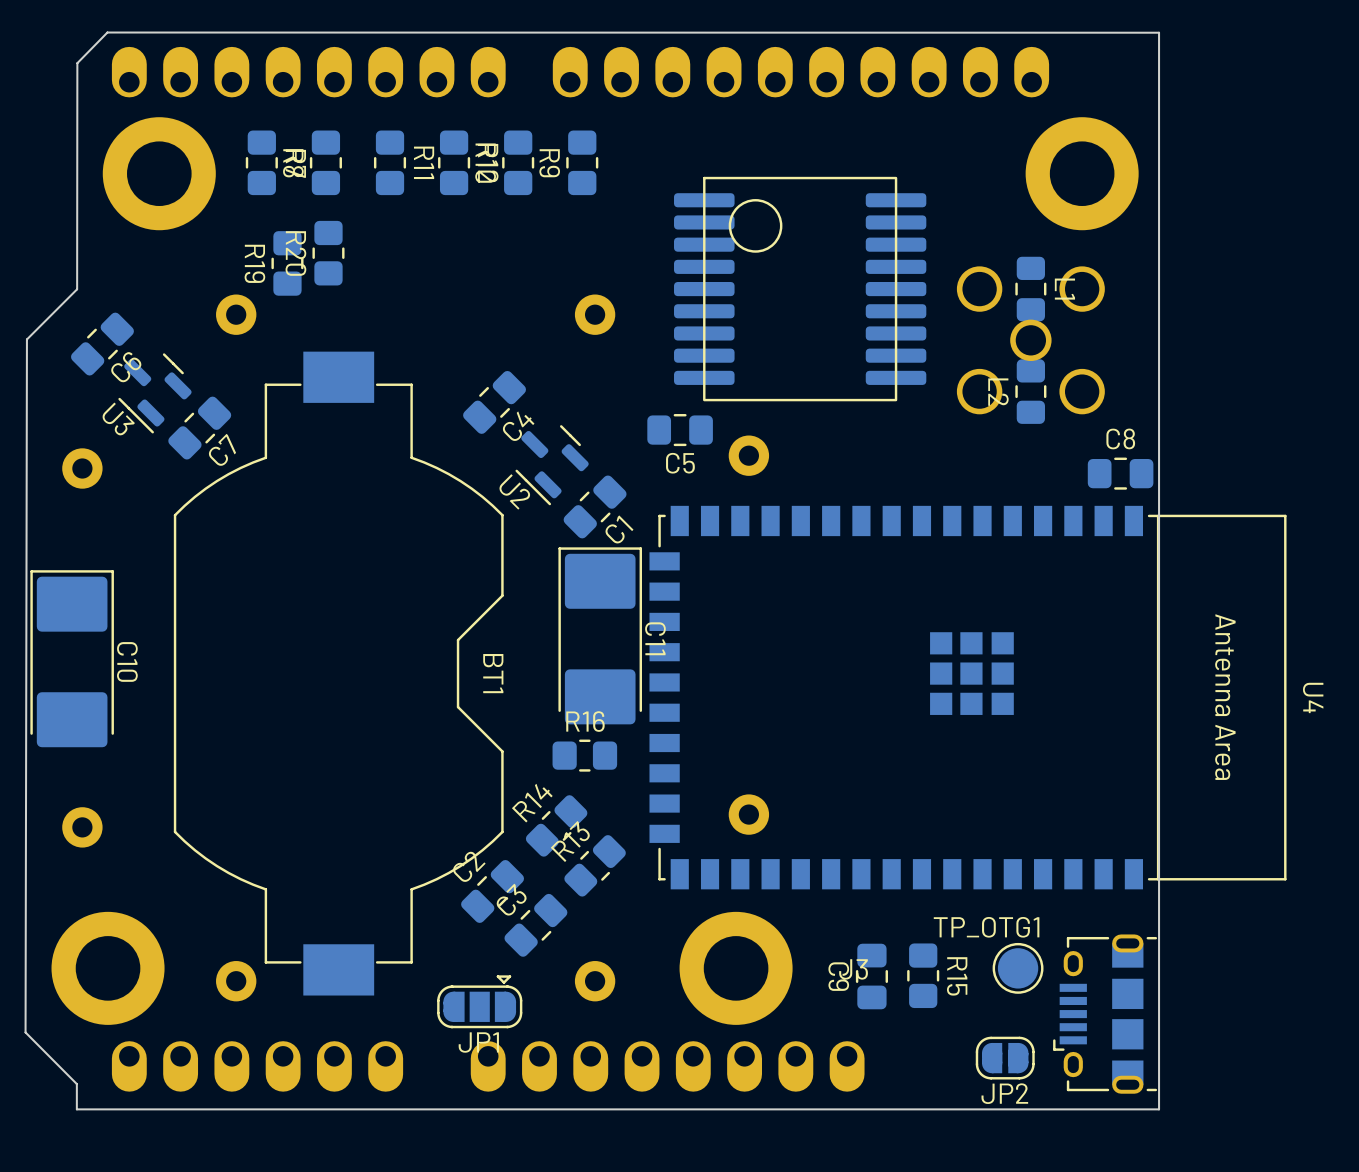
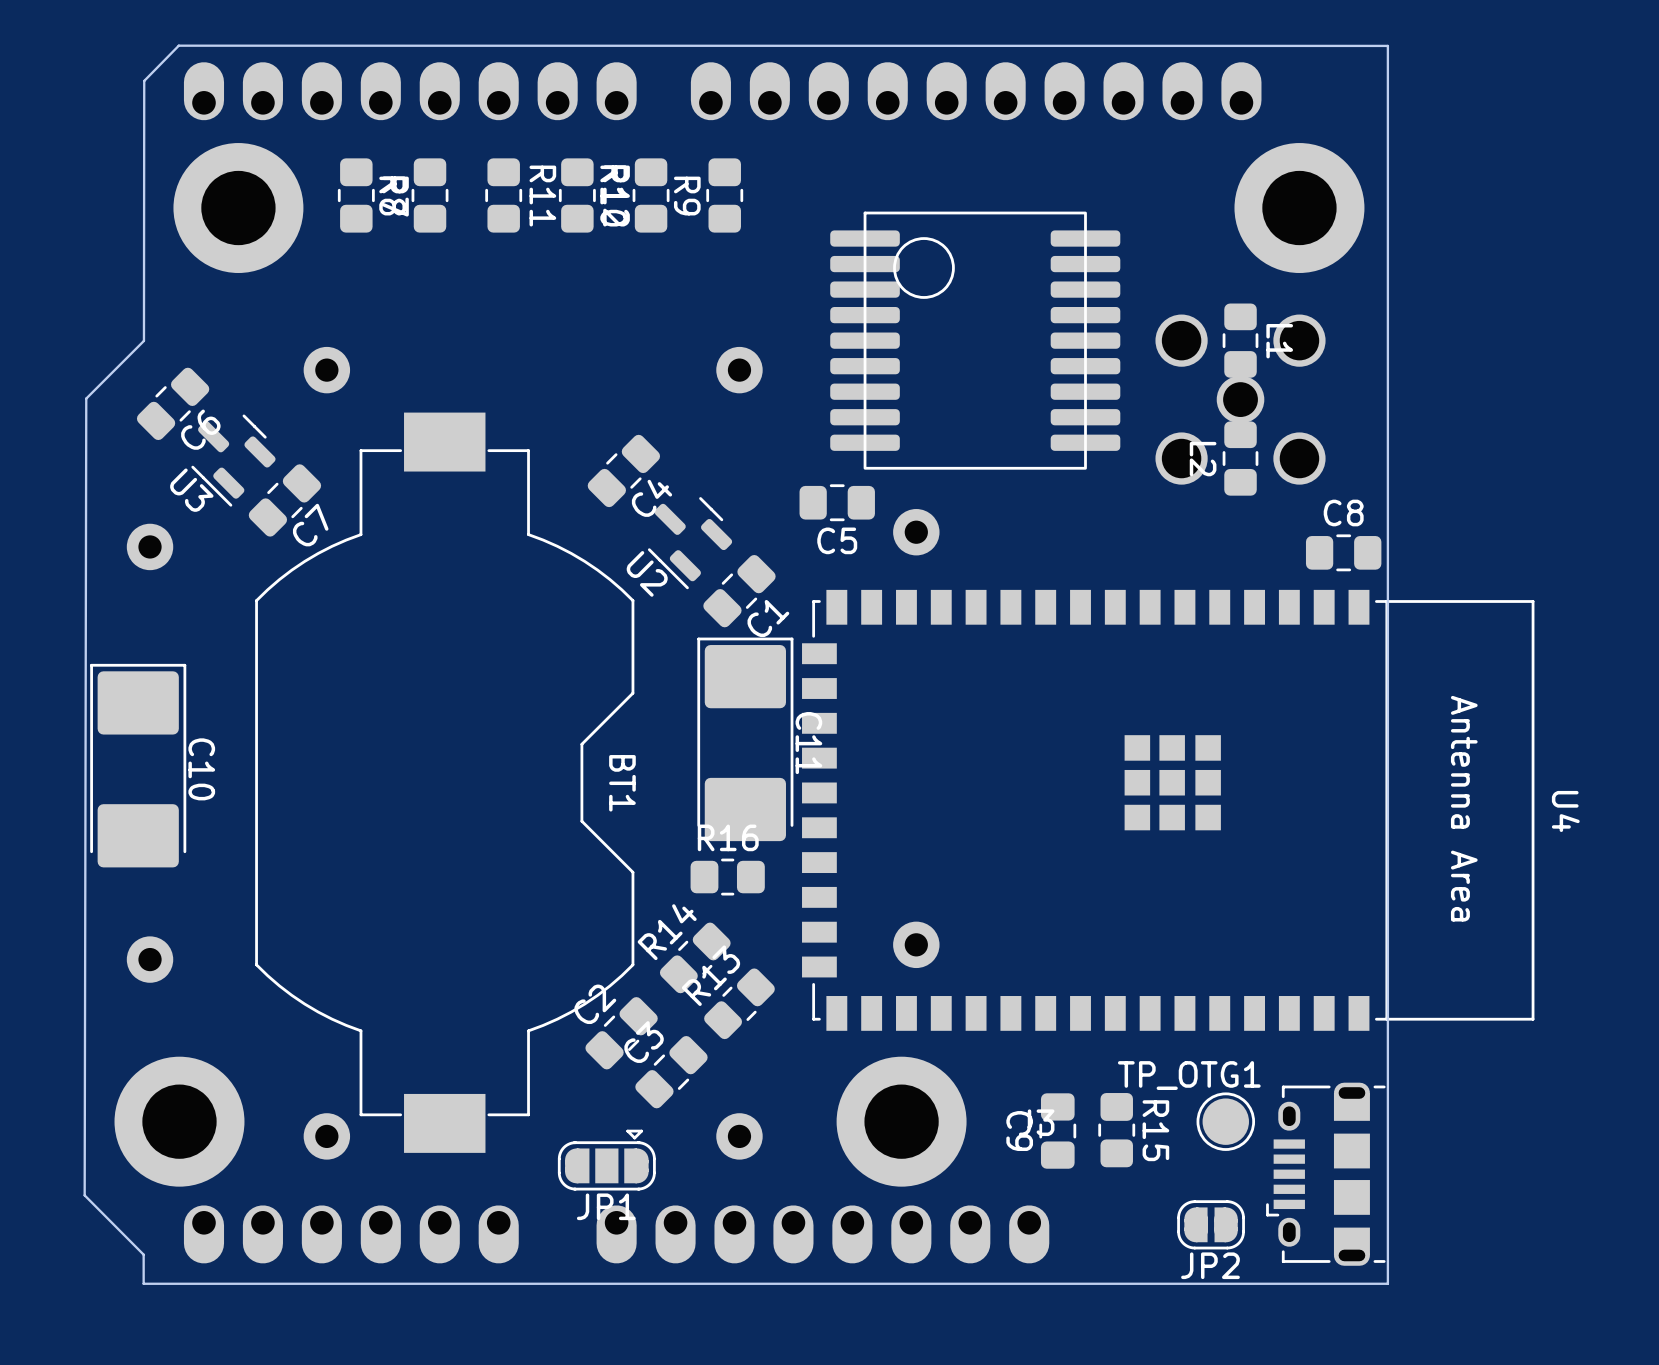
R20: (328, 253) -> none
R19: (287, 263) -> none

